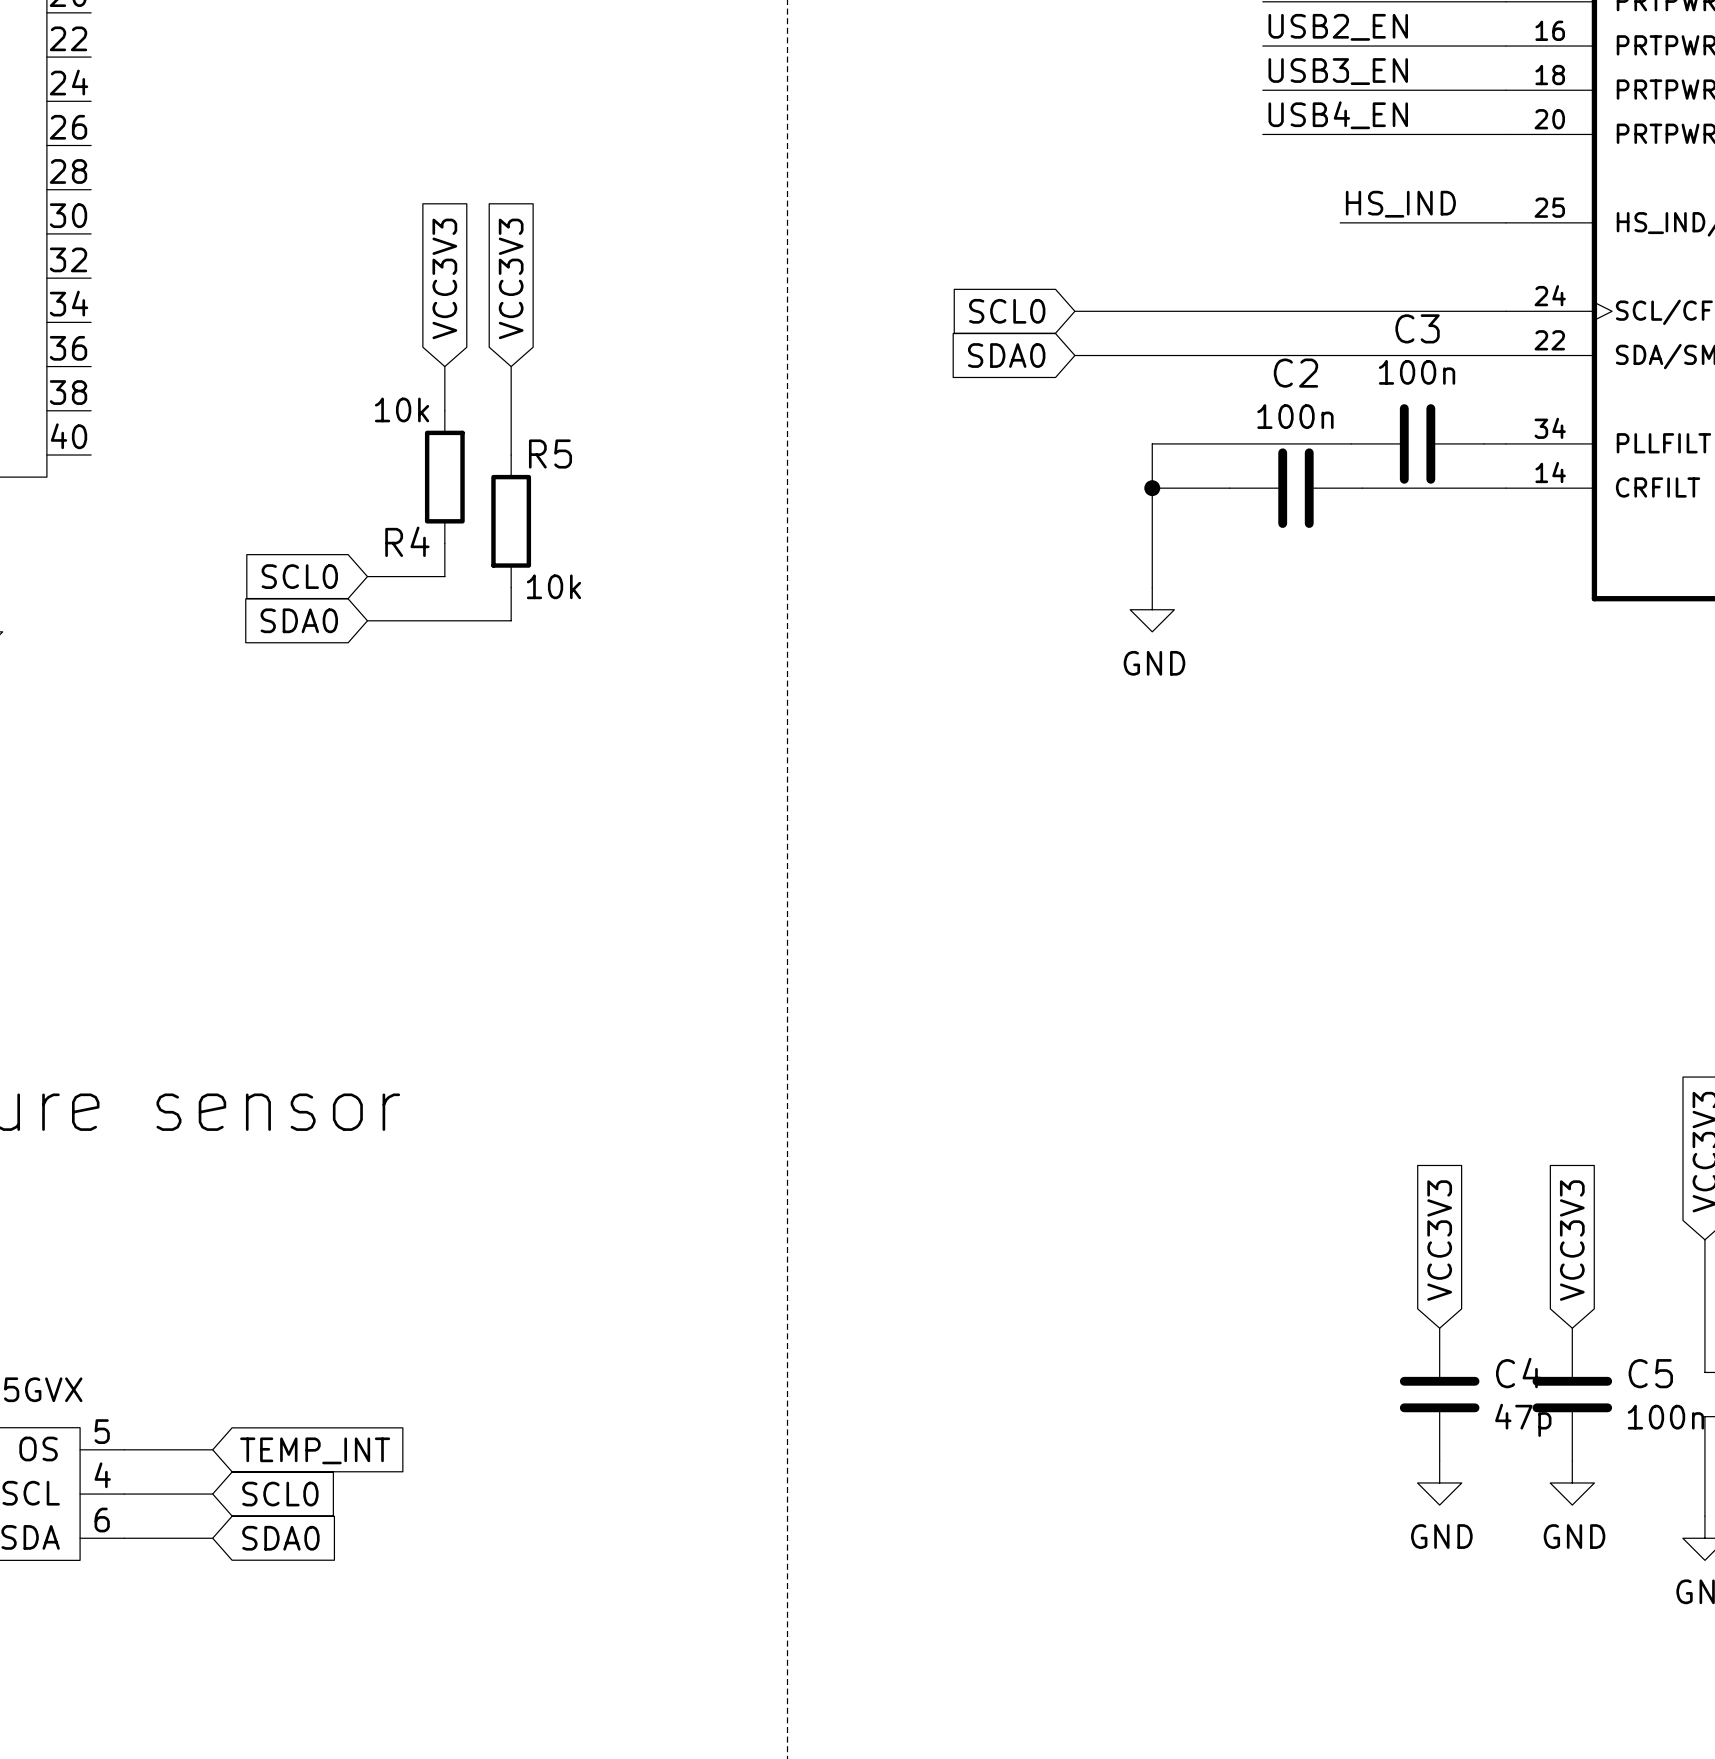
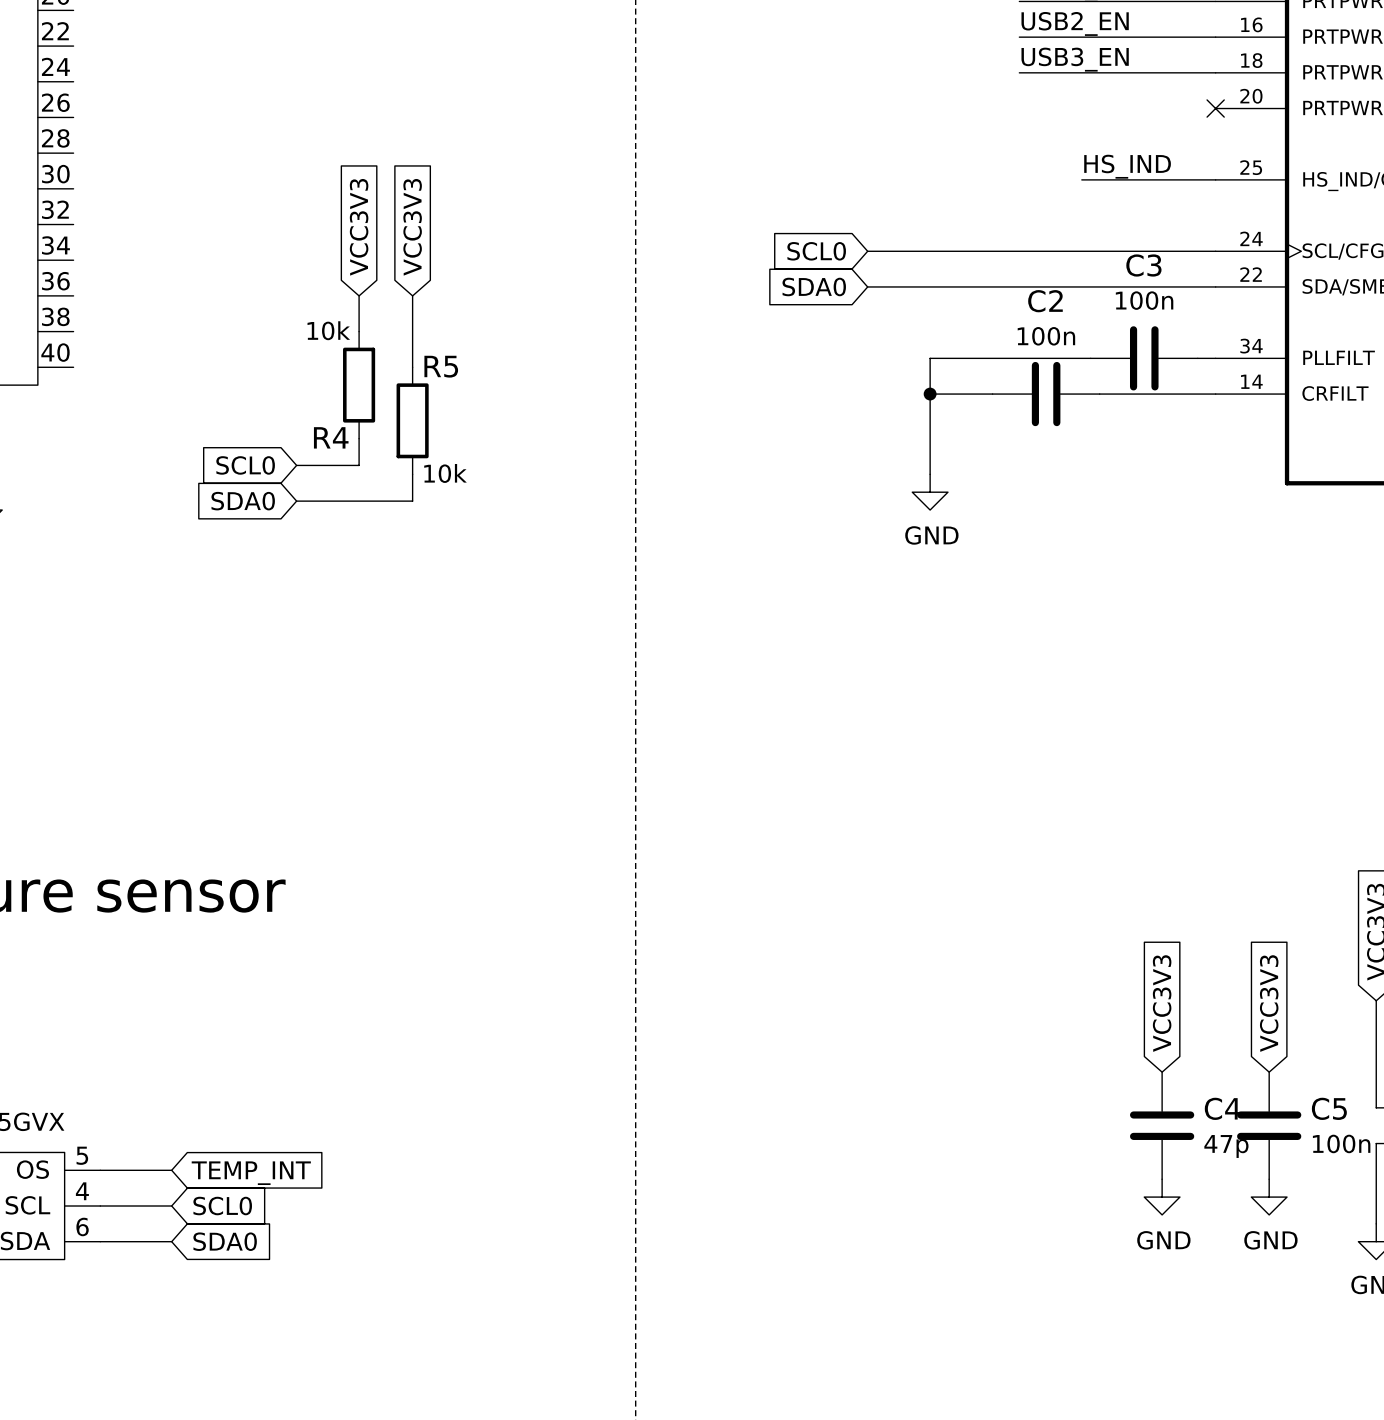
label: USB4_EN (1338, 115) -> none
wire: (1262, 134) (1505, 134) -> none
no-connect mark: none -> (1215, 108)

